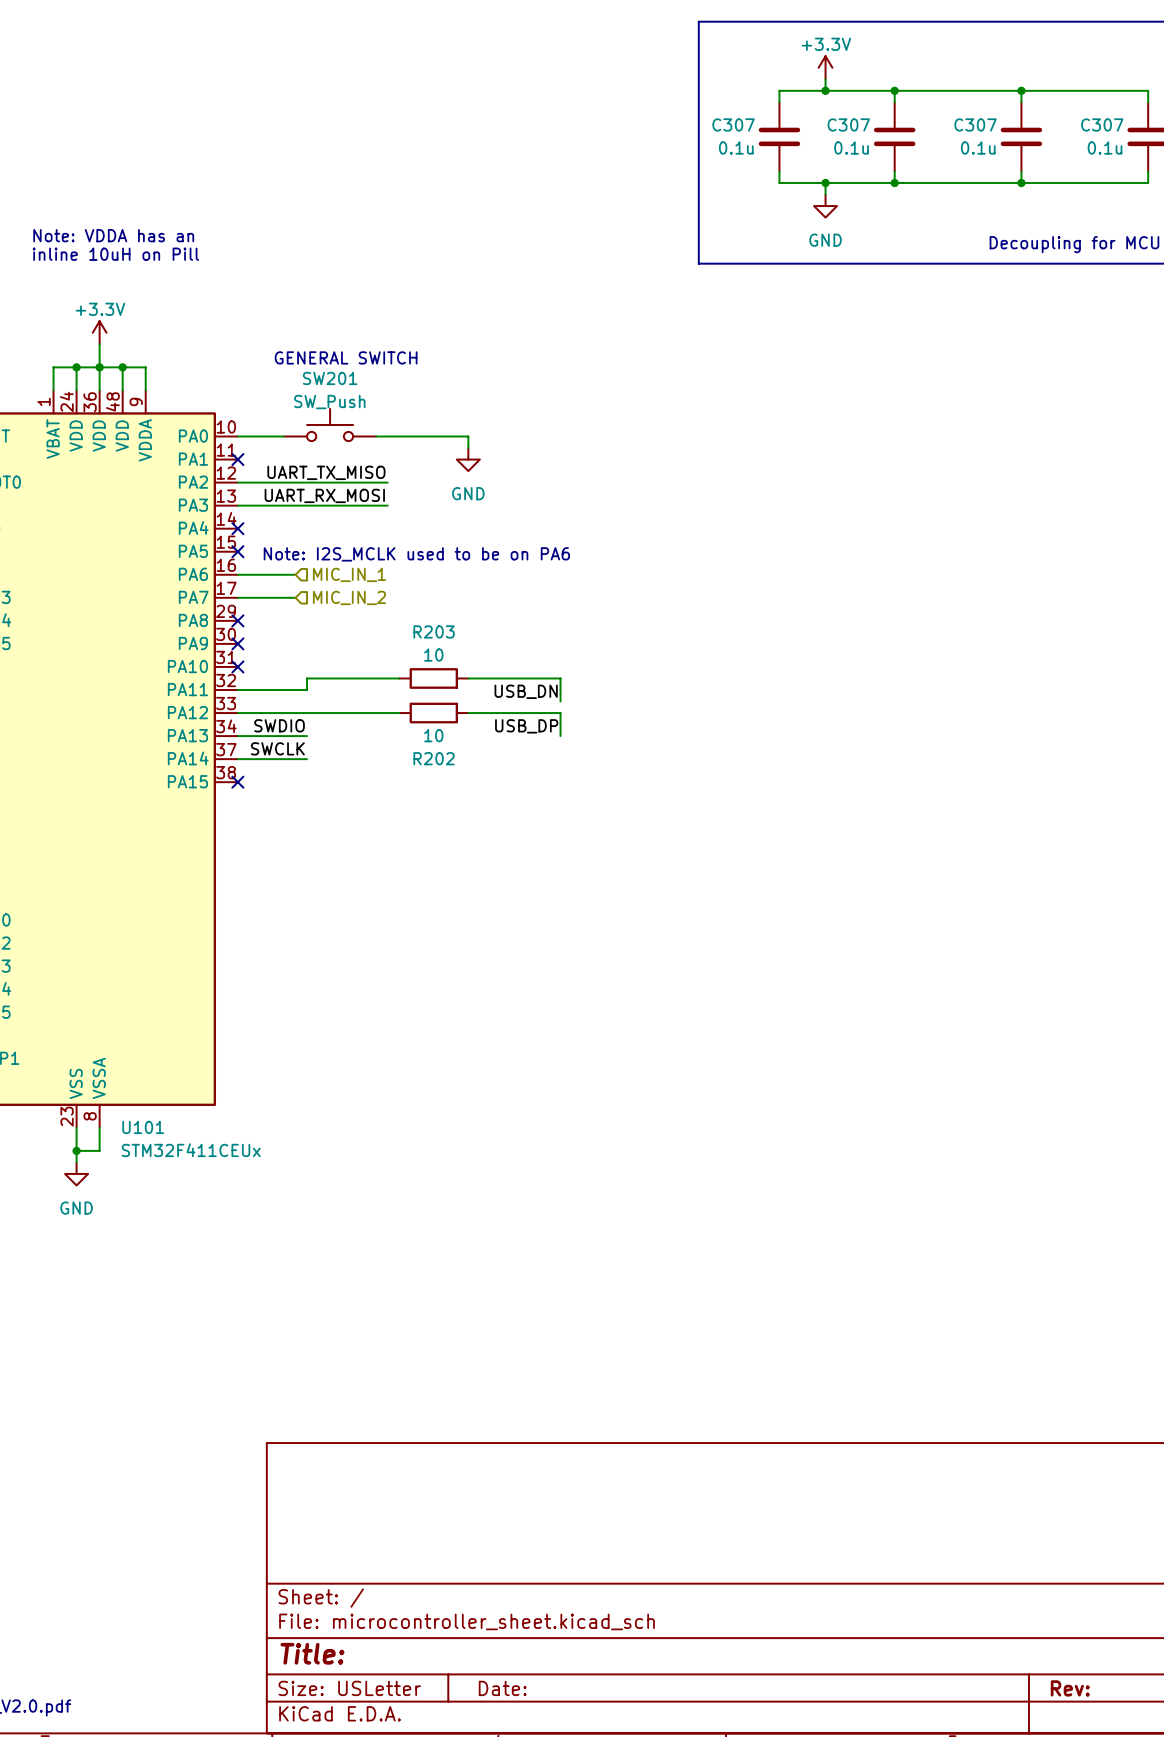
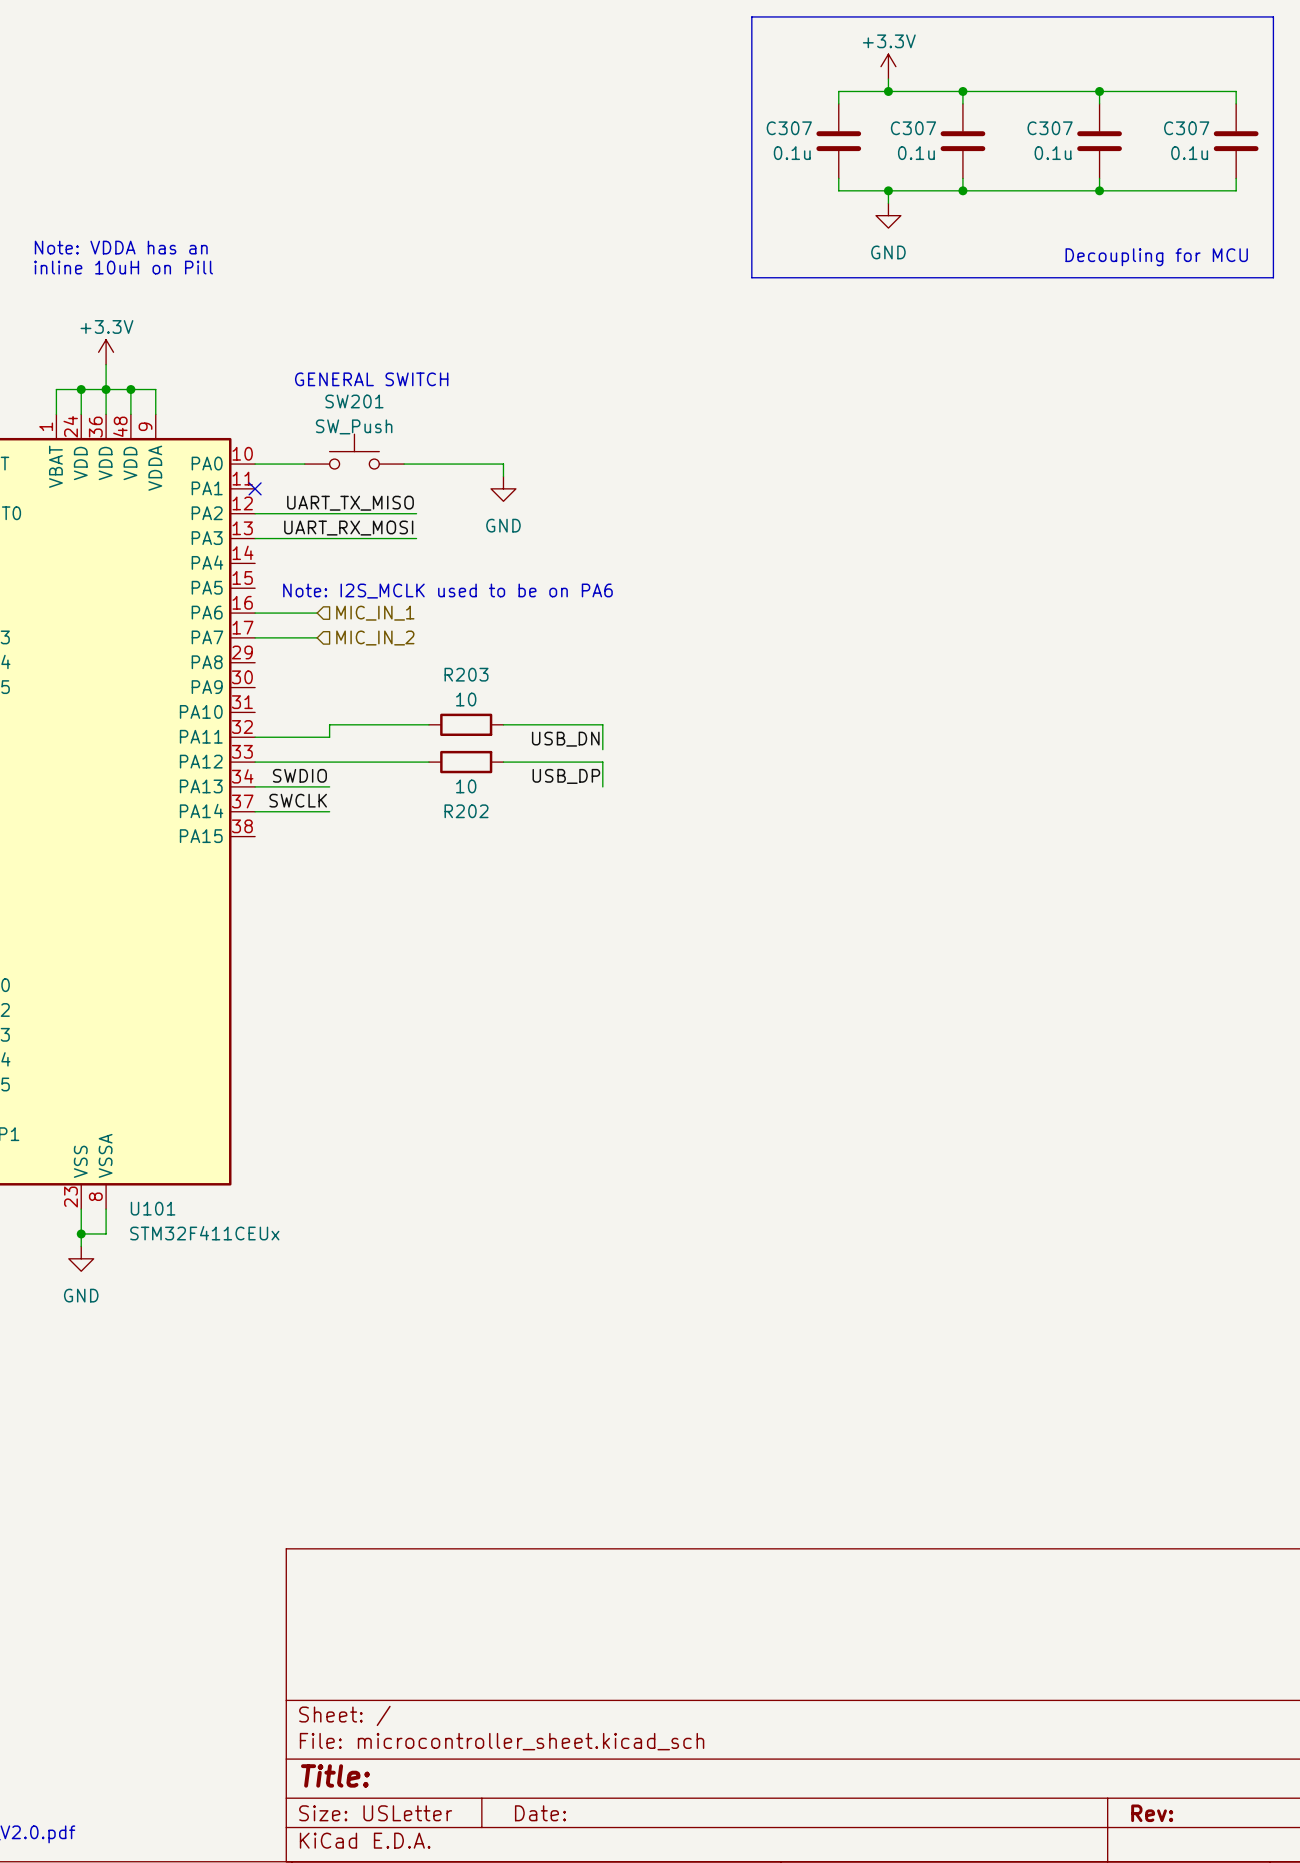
no-connect mark: (237, 528) -> none
no-connect mark: (237, 551) -> none
no-connect mark: (237, 620) -> none
no-connect mark: (237, 643) -> none
no-connect mark: (237, 666) -> none
no-connect mark: (237, 782) -> none

